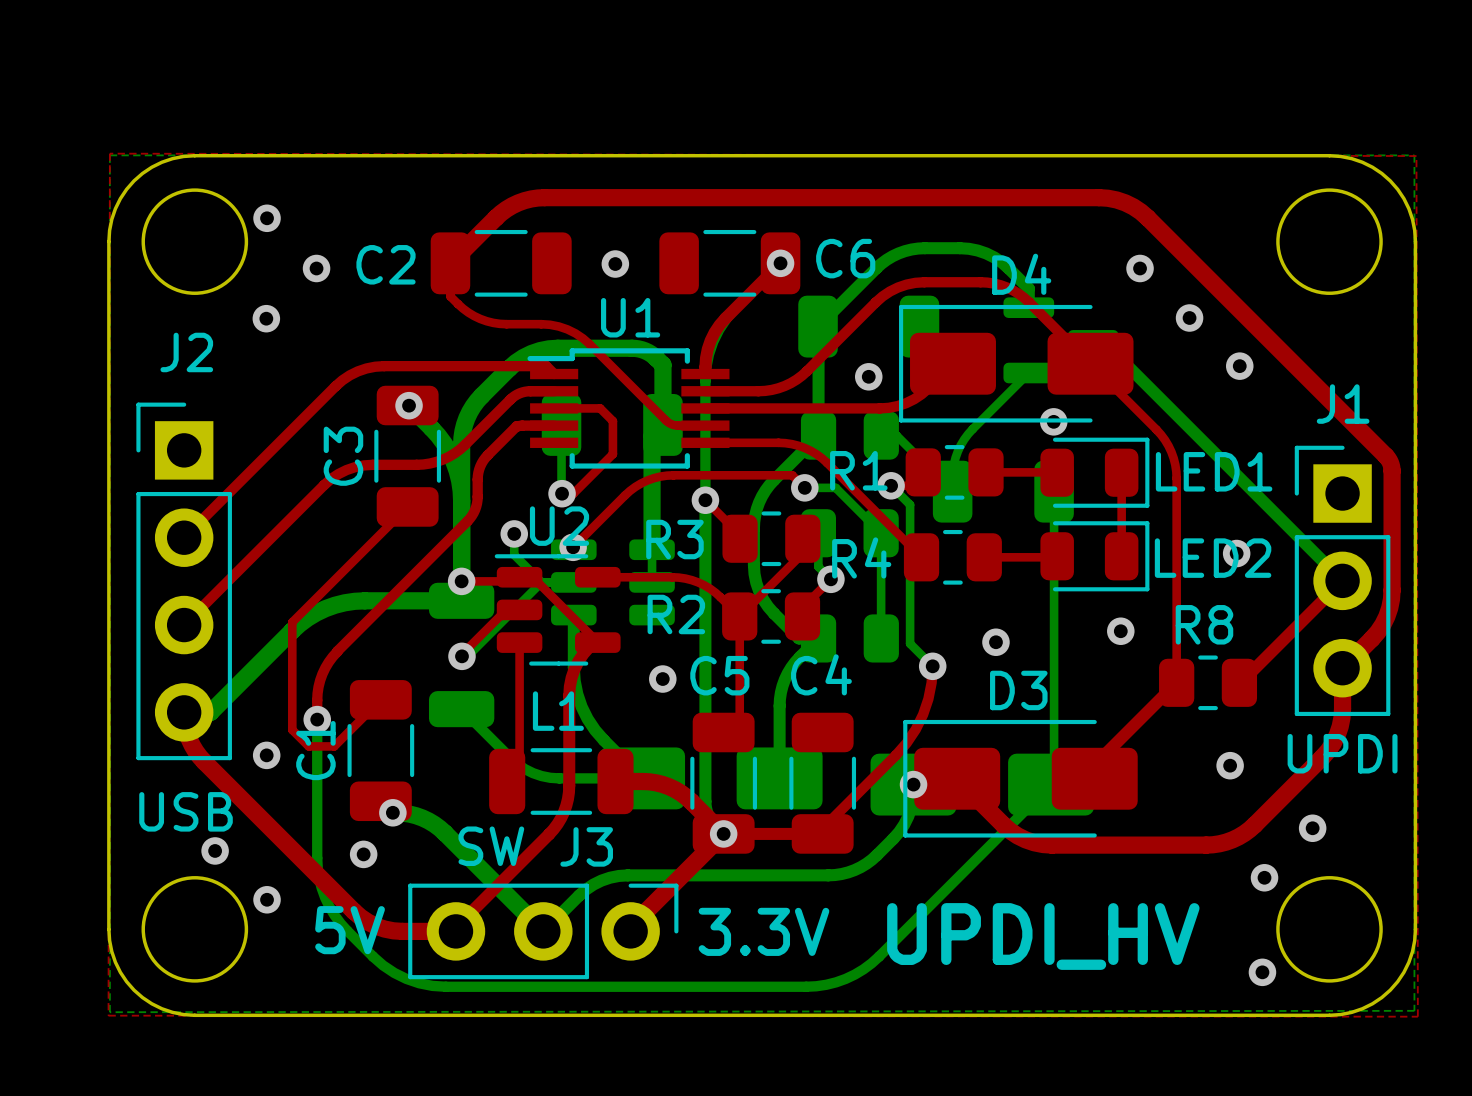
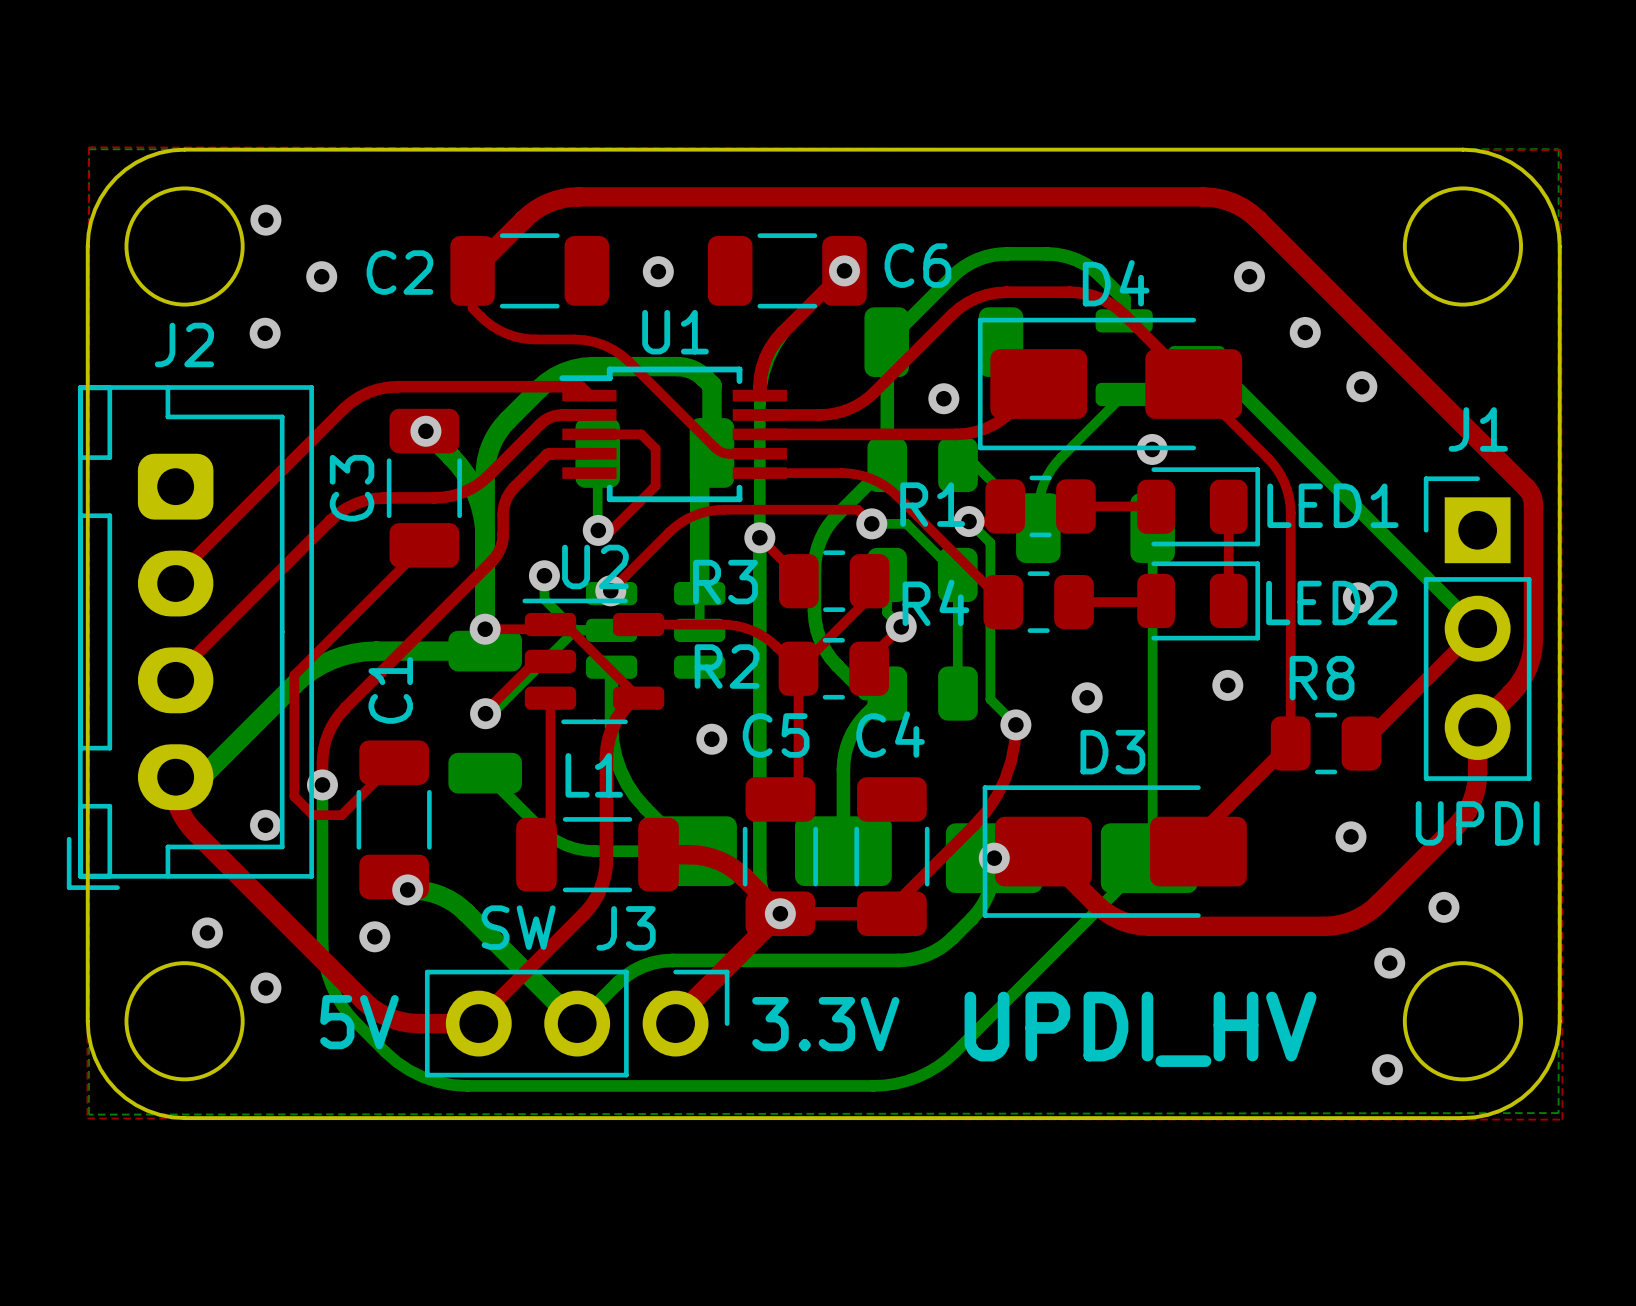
J2 footprint: [136, 402, 232, 761] -> [66, 385, 314, 890]
C1 name position: C1 (315, 750) -> C1 (390, 690)
J2 value: USB (186, 811) -> none

